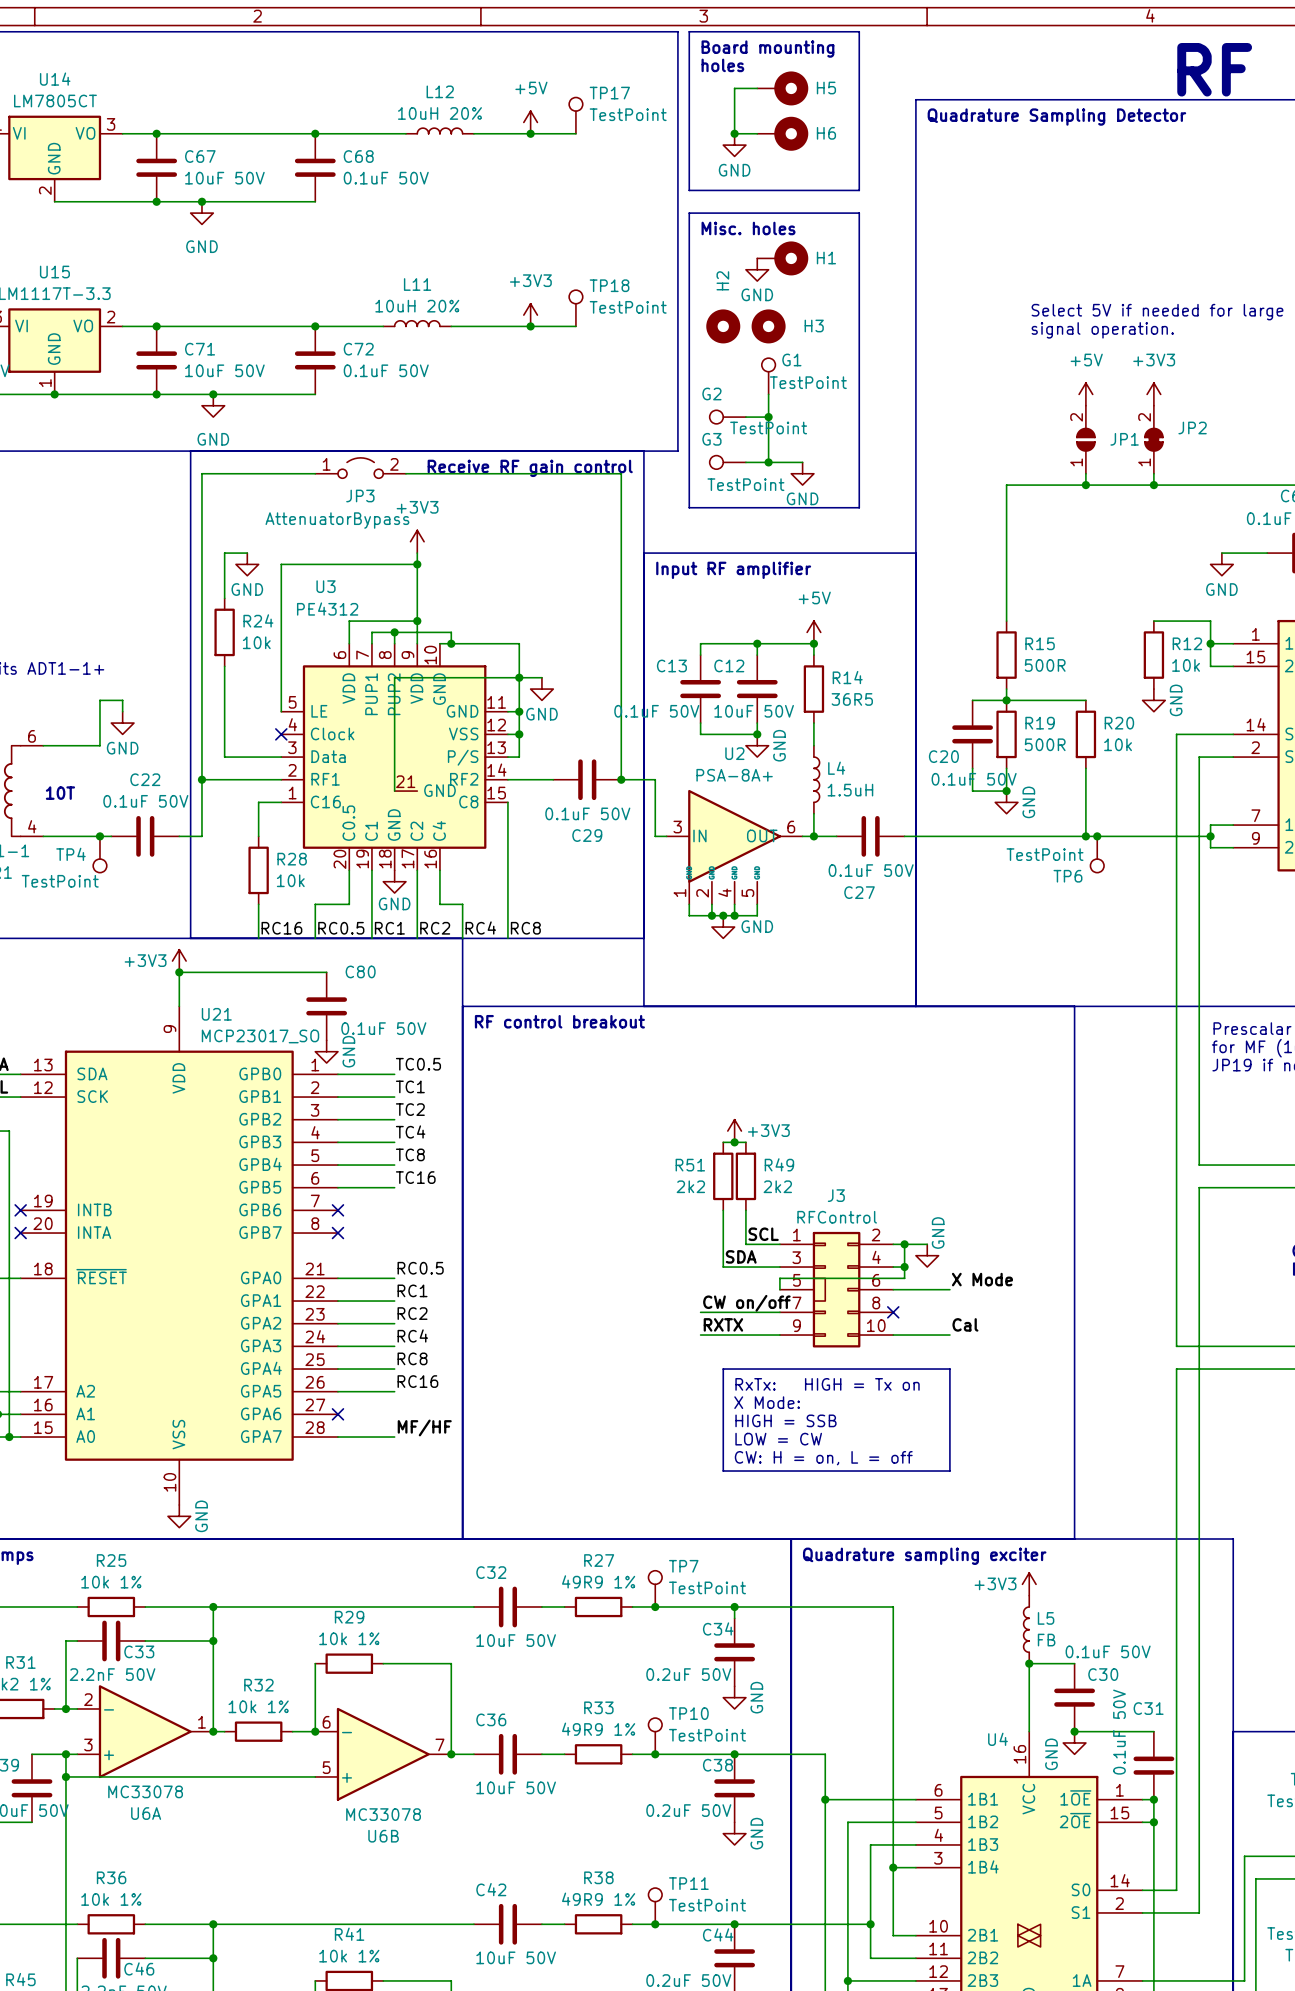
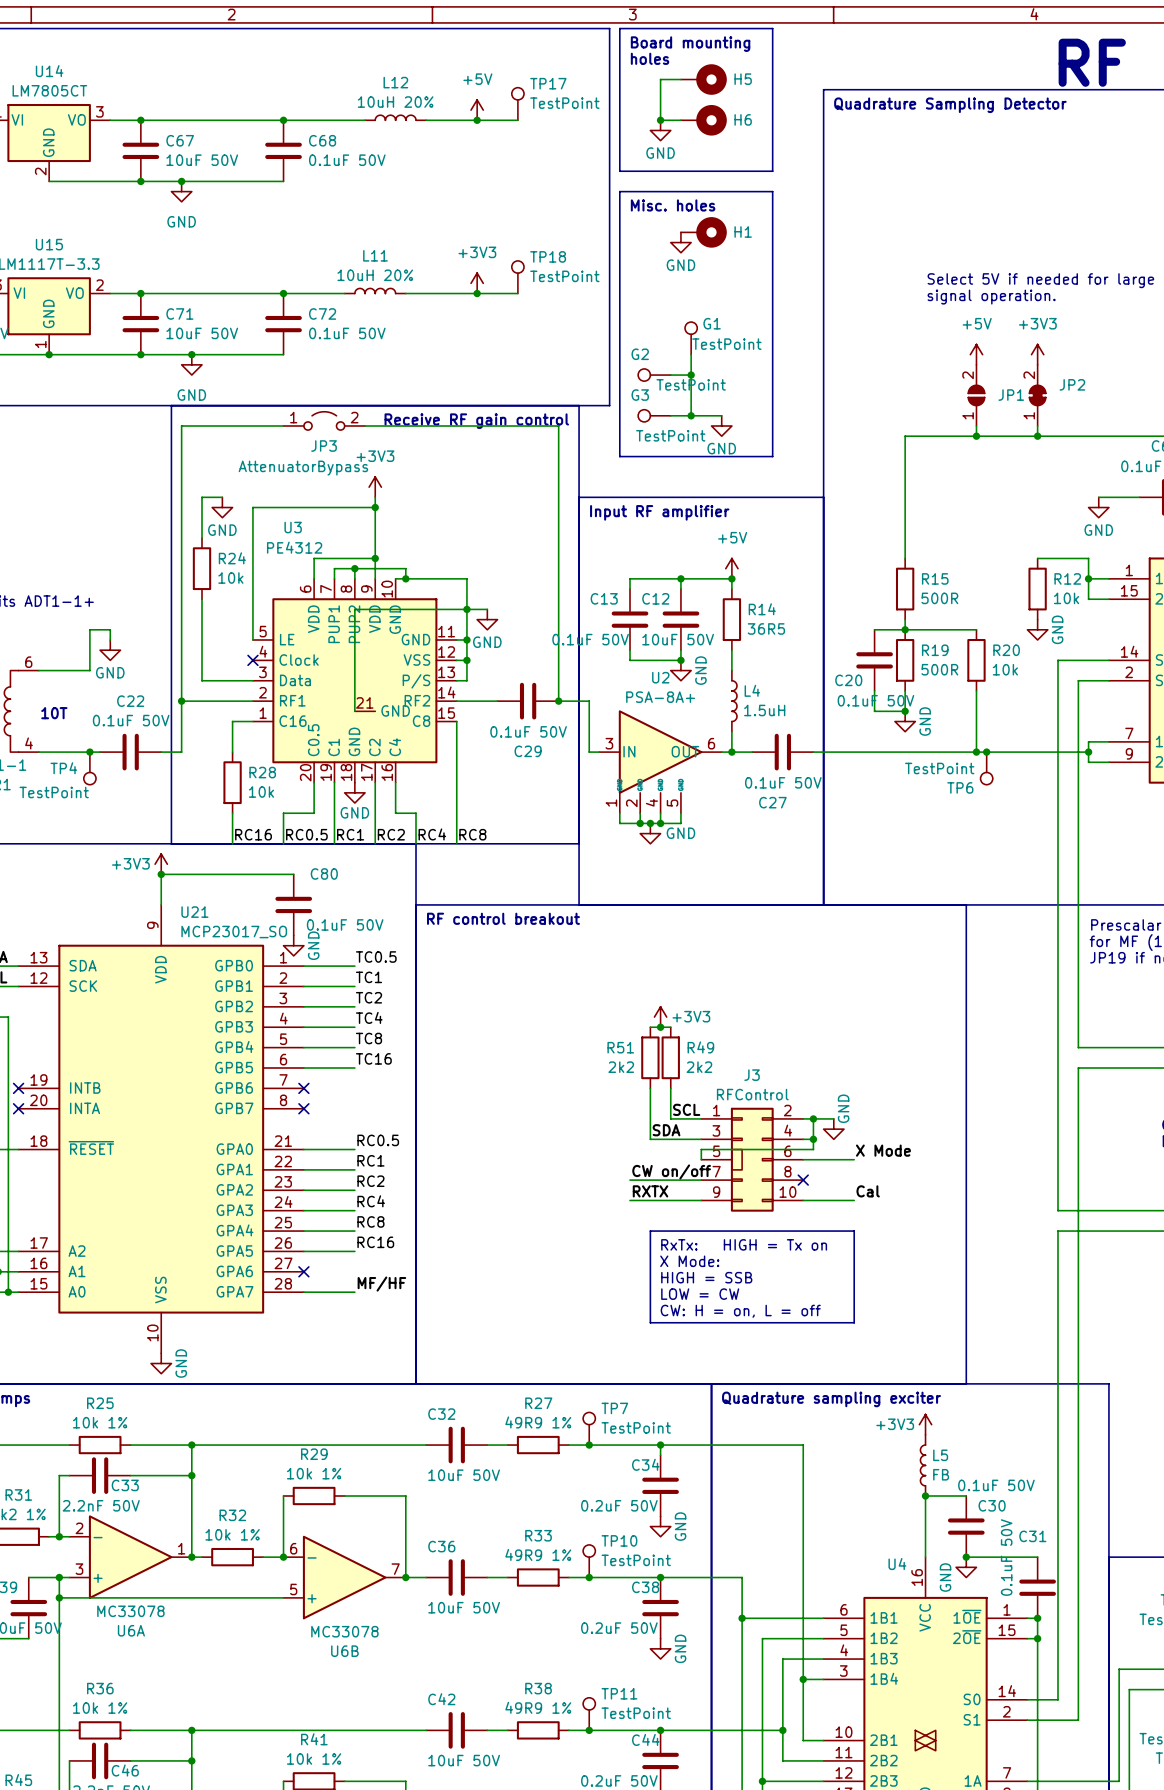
H2: (723, 326) -> none
H3: (768, 326) -> none

